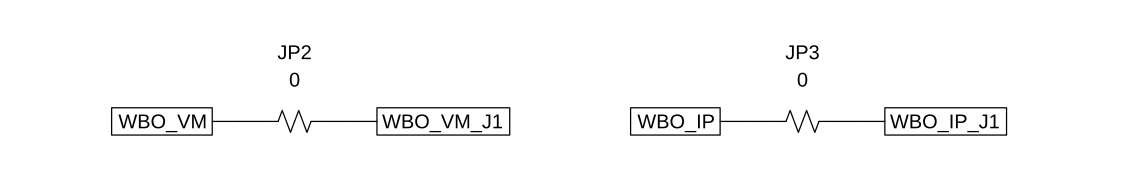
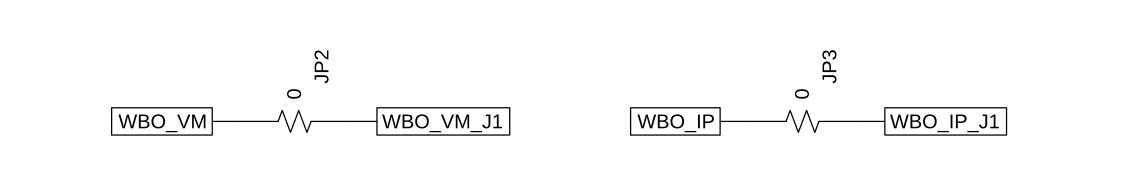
JP2 name rotation: 0° (294, 52) -> 90° counterclockwise (321, 66)
JP3 name rotation: 0° (802, 52) -> 90° counterclockwise (829, 66)
JP2 value rotation: 0° (294, 79) -> 90° counterclockwise (294, 93)
JP3 value rotation: 0° (802, 79) -> 90° counterclockwise (801, 93)

